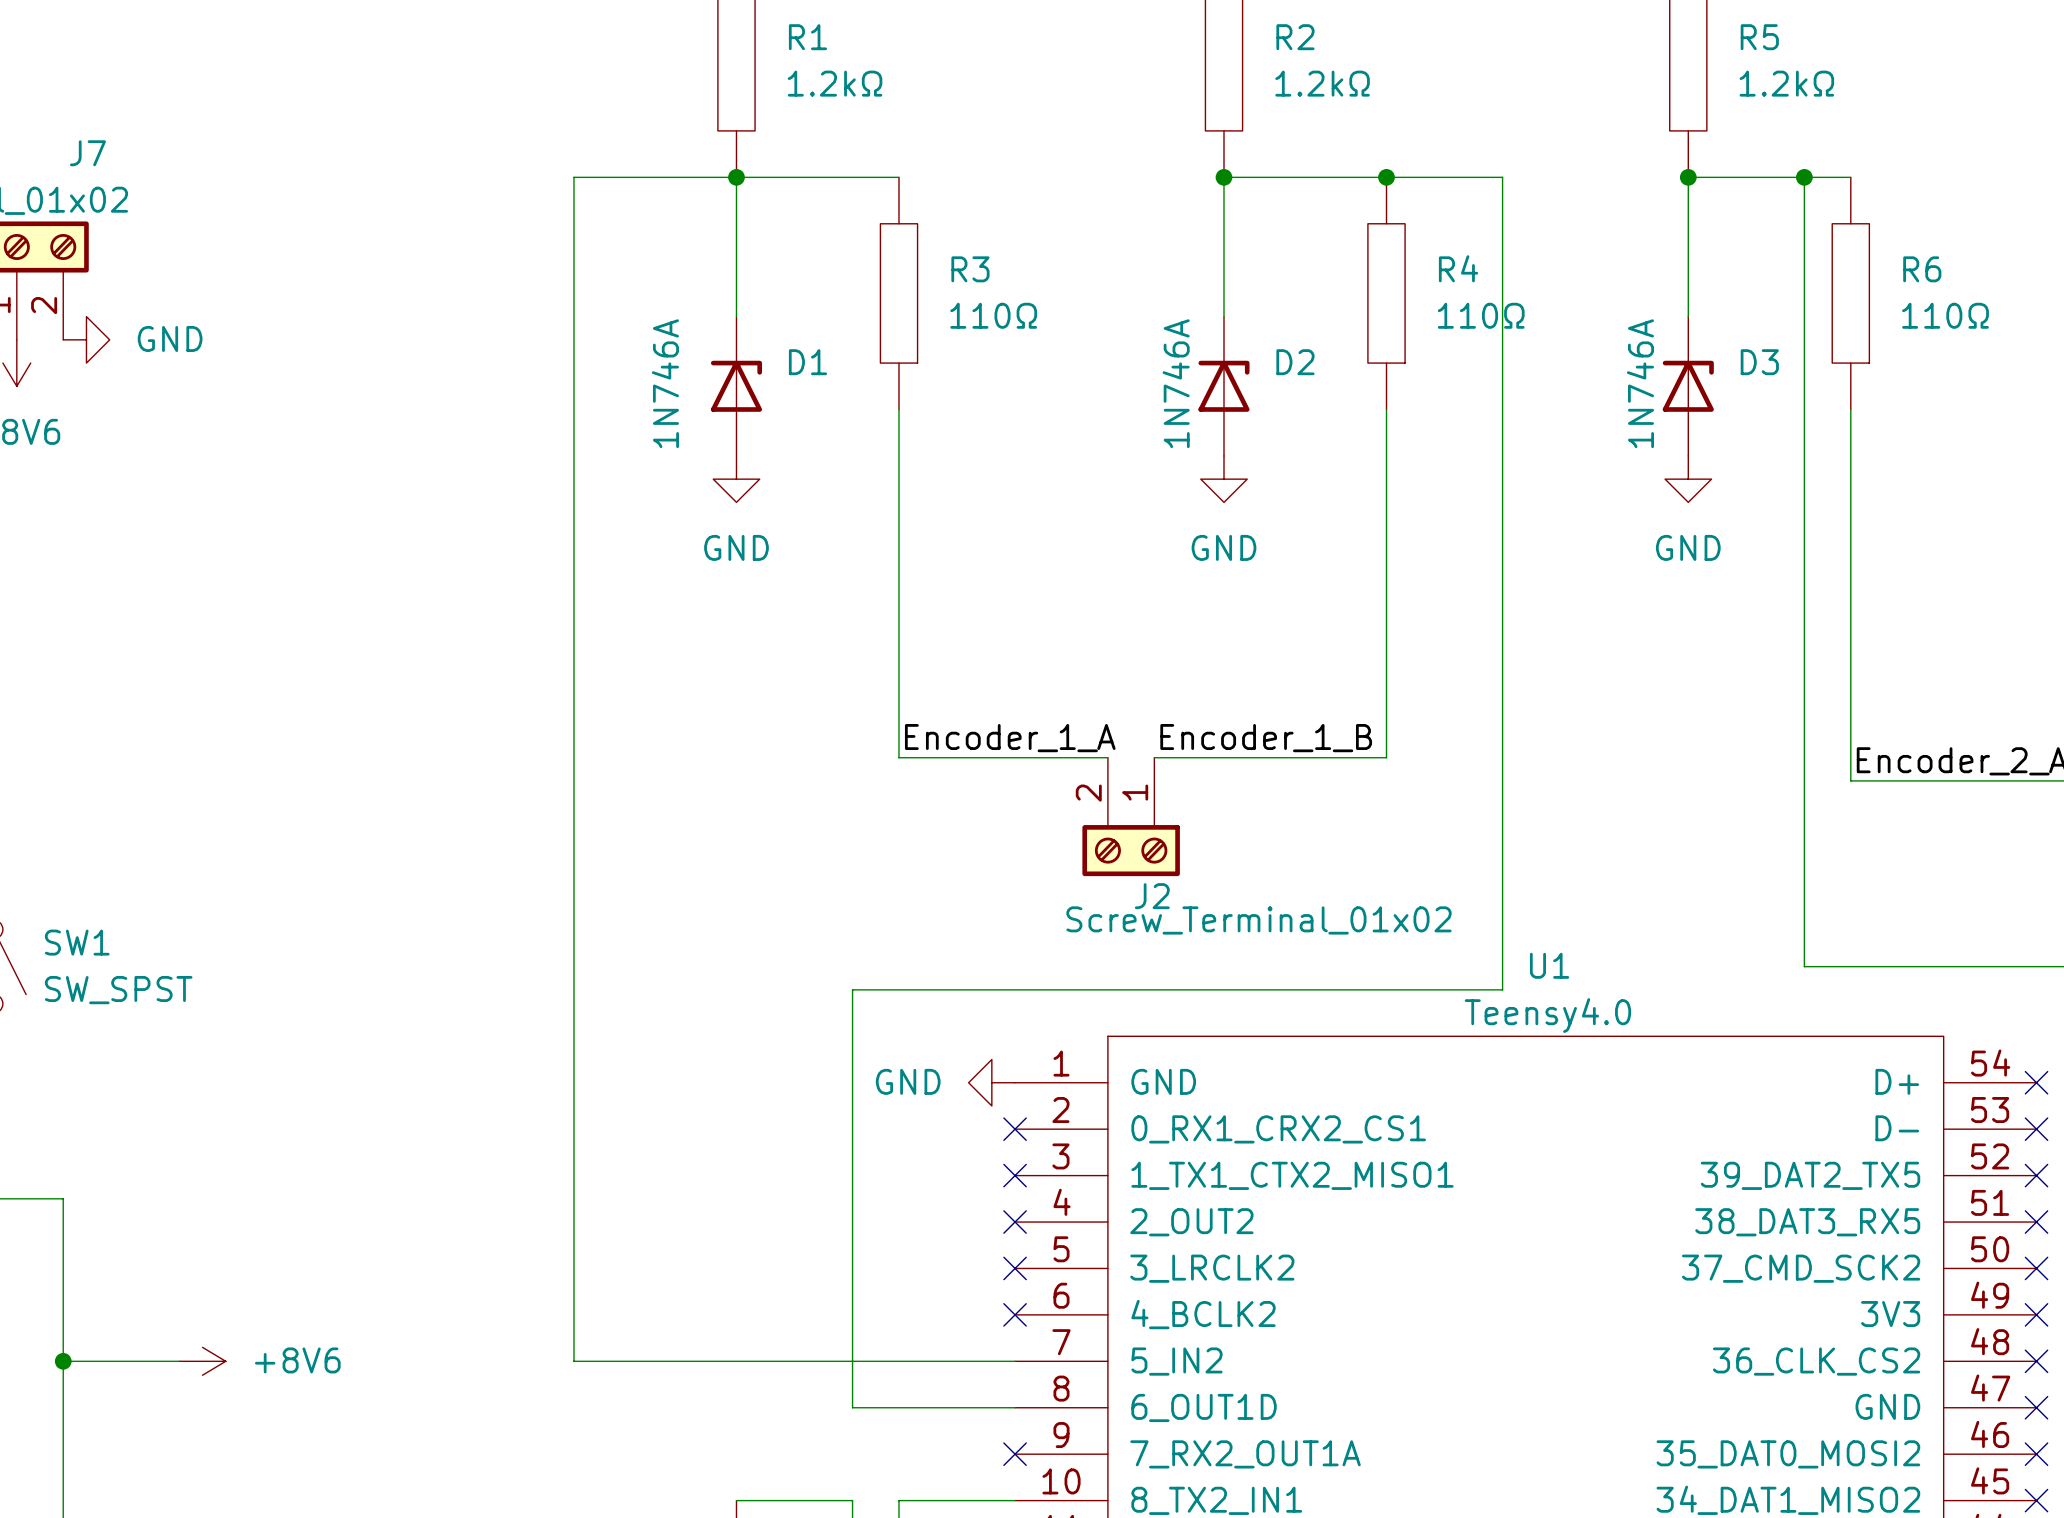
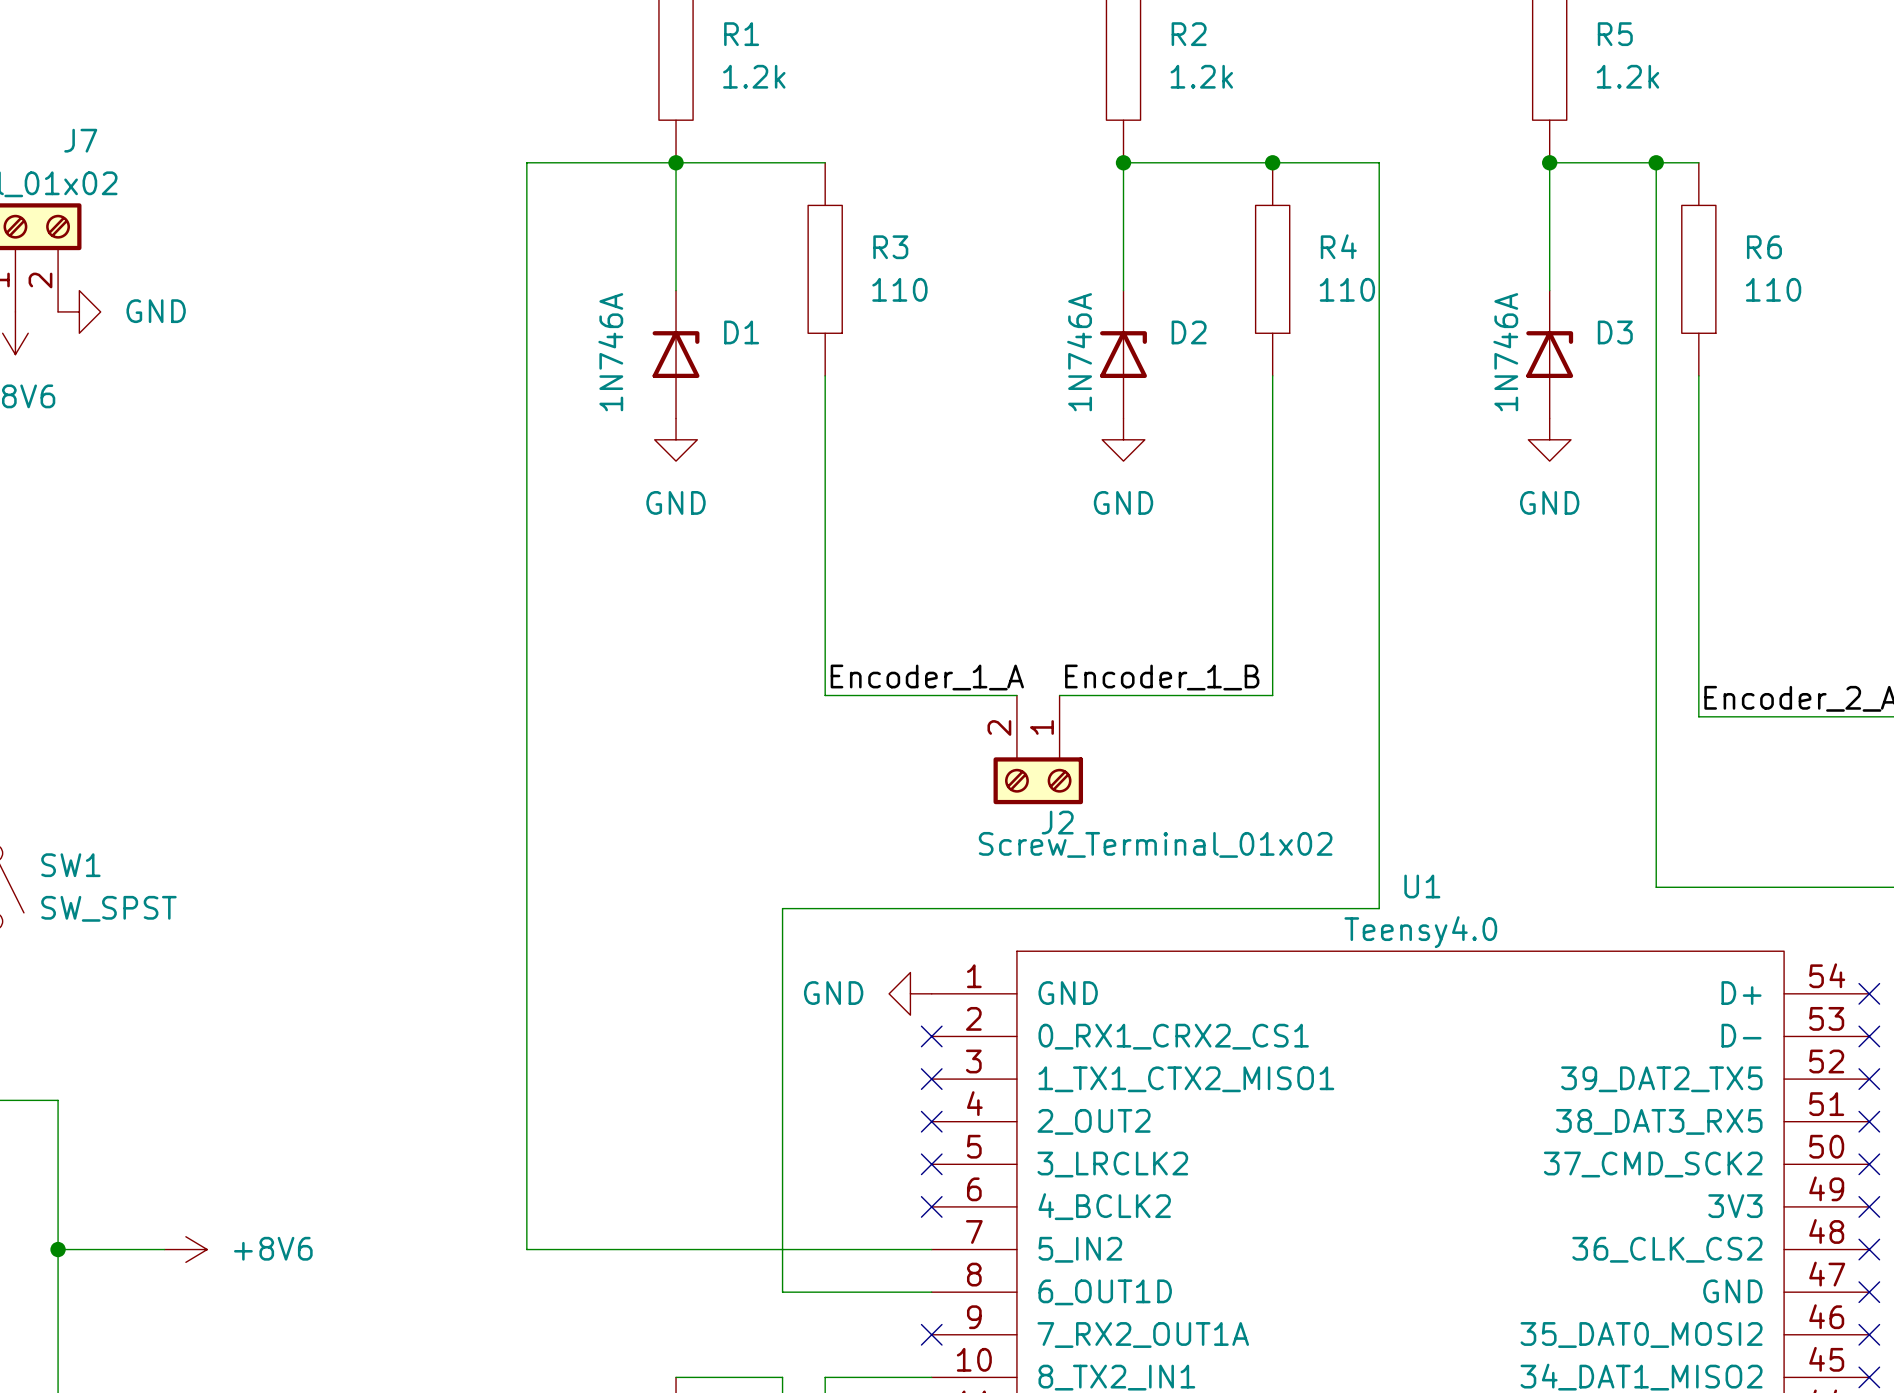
R1 value: 1.2kΩ (835, 83) -> 1.2k (754, 76)
R2 value: 1.2kΩ (1322, 83) -> 1.2k (1201, 76)
R5 value: 1.2kΩ (1786, 83) -> 1.2k (1627, 76)
R3 value: 110Ω (993, 315) -> 110 (899, 289)
R4 value: 110Ω (1481, 315) -> 110 (1347, 289)
R6 value: 110Ω (1945, 315) -> 110 (1773, 289)

